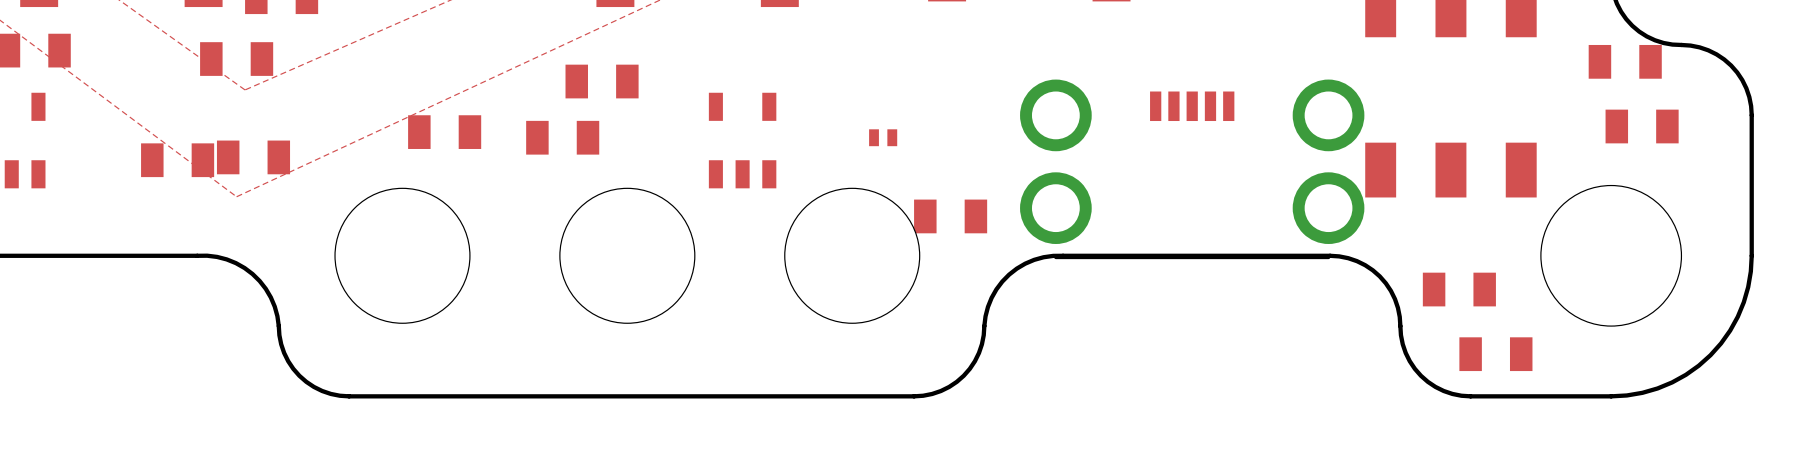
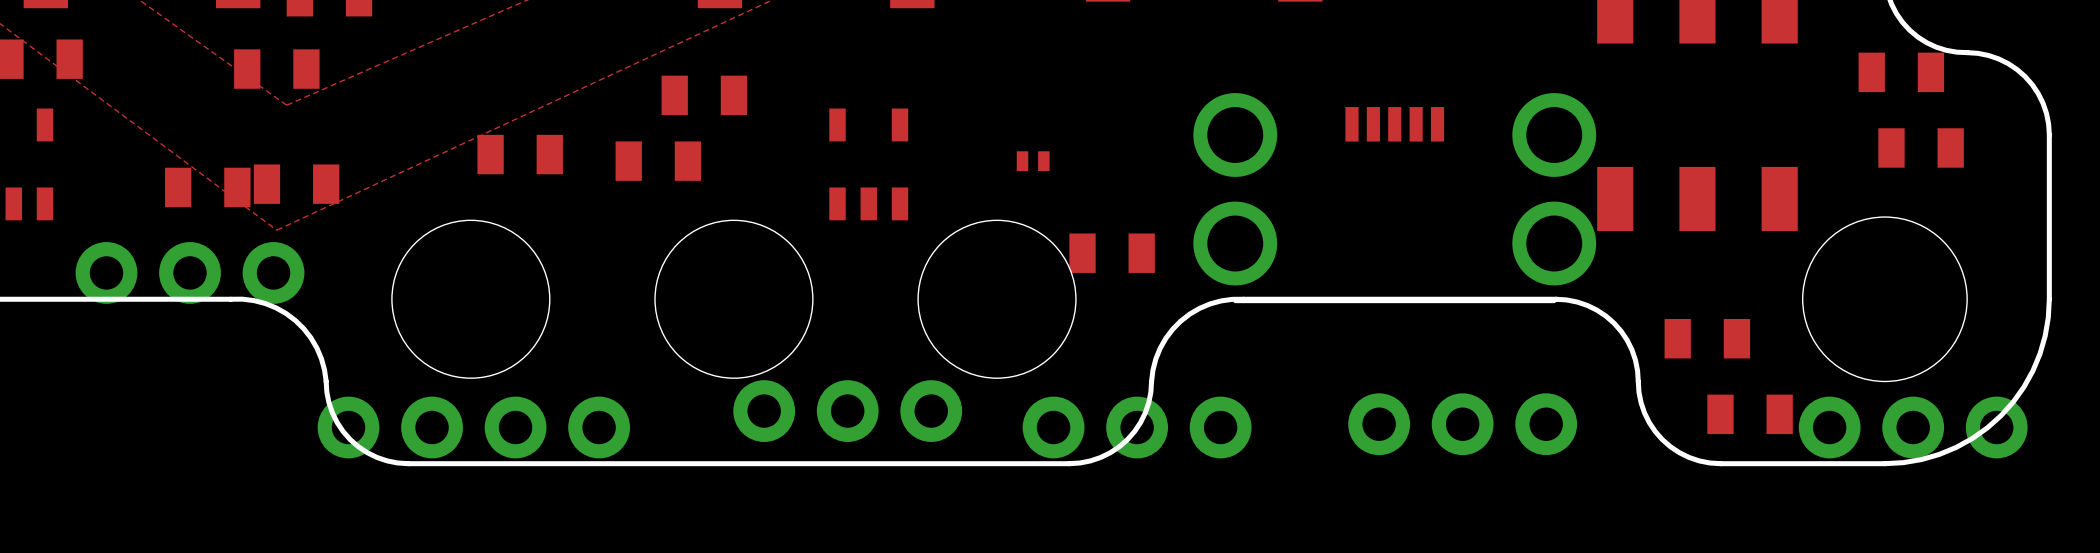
part: none -> (190, 272)
part: none -> (847, 411)
part: none -> (1462, 424)
part: none -> (473, 427)
part: none -> (1137, 427)
part: none -> (1913, 427)

